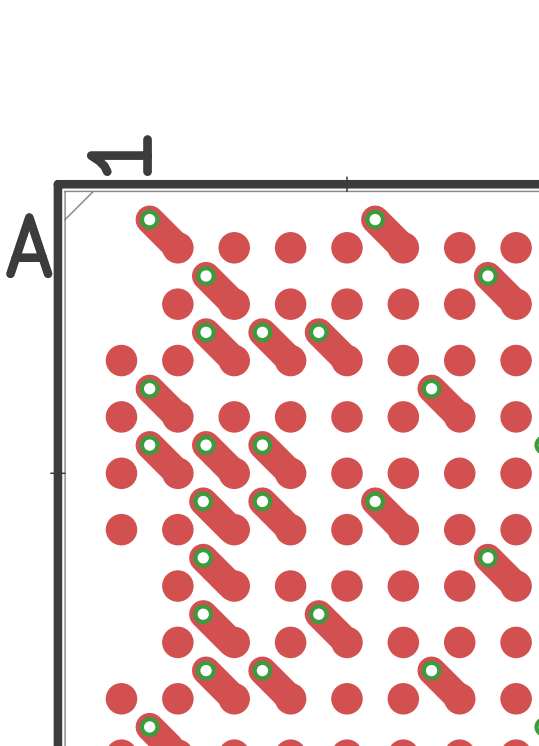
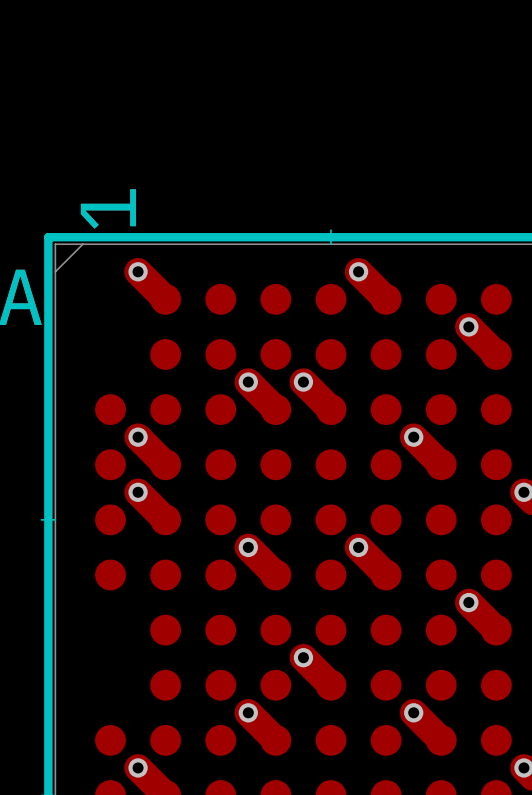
track: (206, 275) (234, 304) -> none
via: (206, 275) -> none
track: (206, 332) (234, 360) -> none
via: (206, 332) -> none
track: (206, 445) (234, 473) -> none
via: (206, 445) -> none
track: (262, 445) (290, 473) -> none
via: (262, 445) -> none
track: (203, 501) (231, 529) -> none
via: (203, 501) -> none
track: (203, 557) (231, 586) -> none
via: (203, 557) -> none
track: (203, 614) (231, 642) -> none
via: (203, 614) -> none
track: (206, 670) (234, 698) -> none
via: (206, 670) -> none

